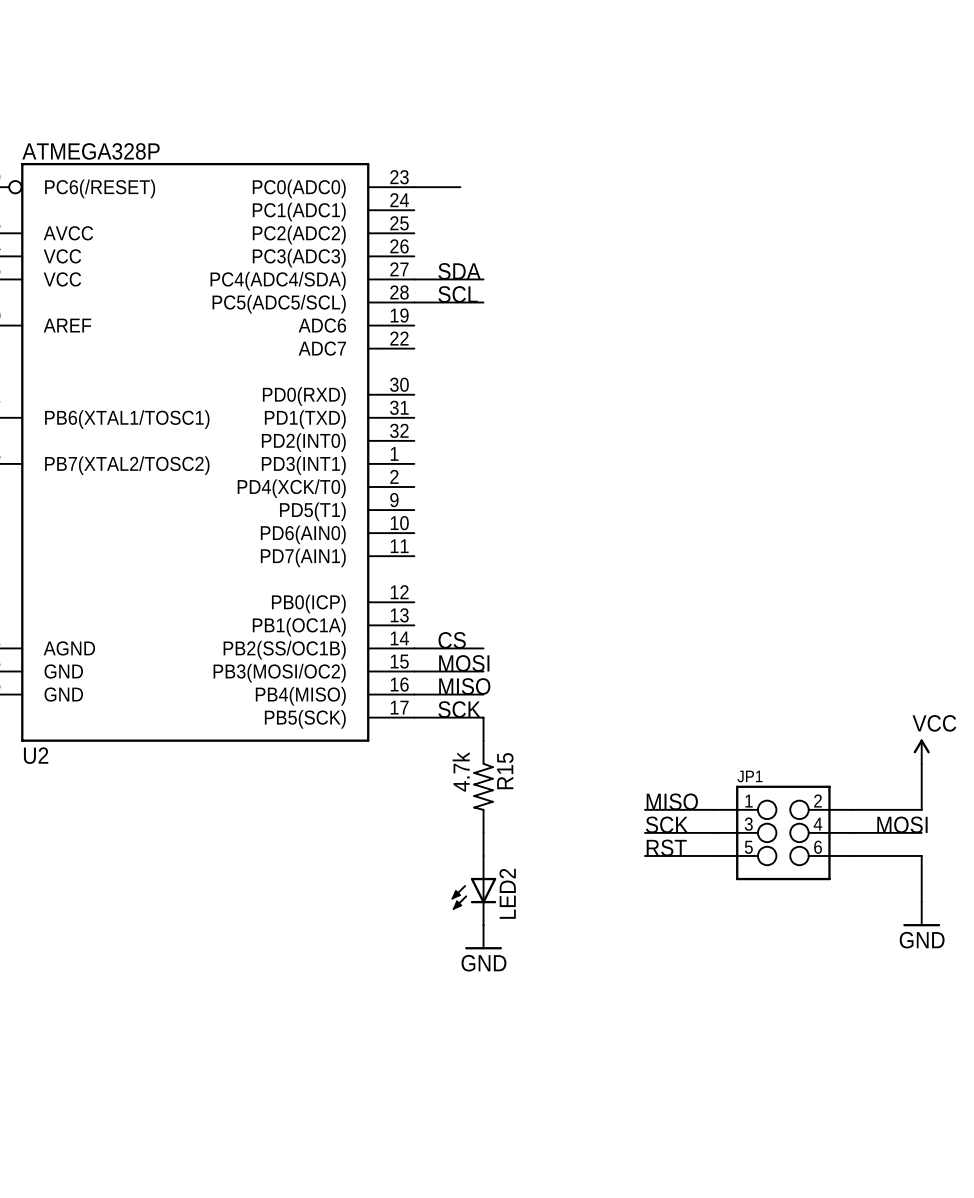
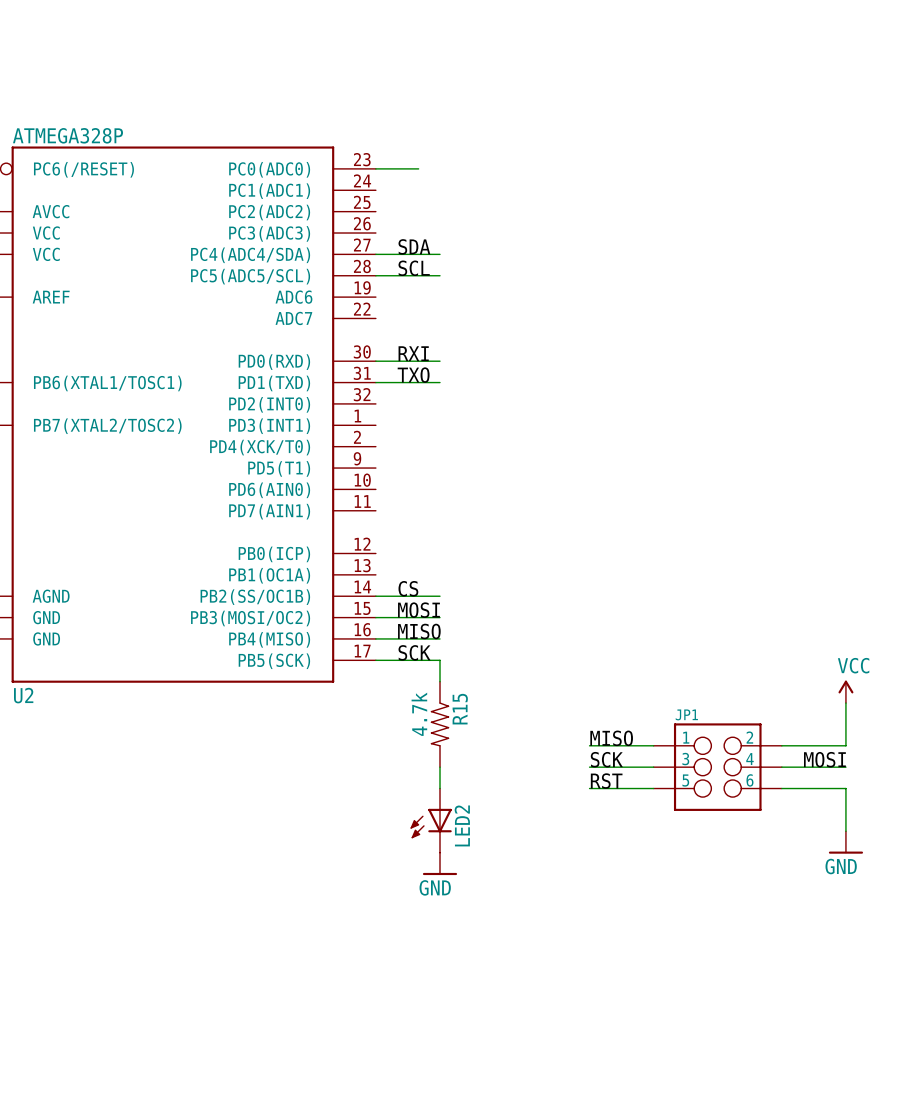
label: none -> RXI (413, 353)
wire: none -> (375, 361) (440, 361)
label: none -> TXO (413, 375)
wire: none -> (375, 382) (440, 382)

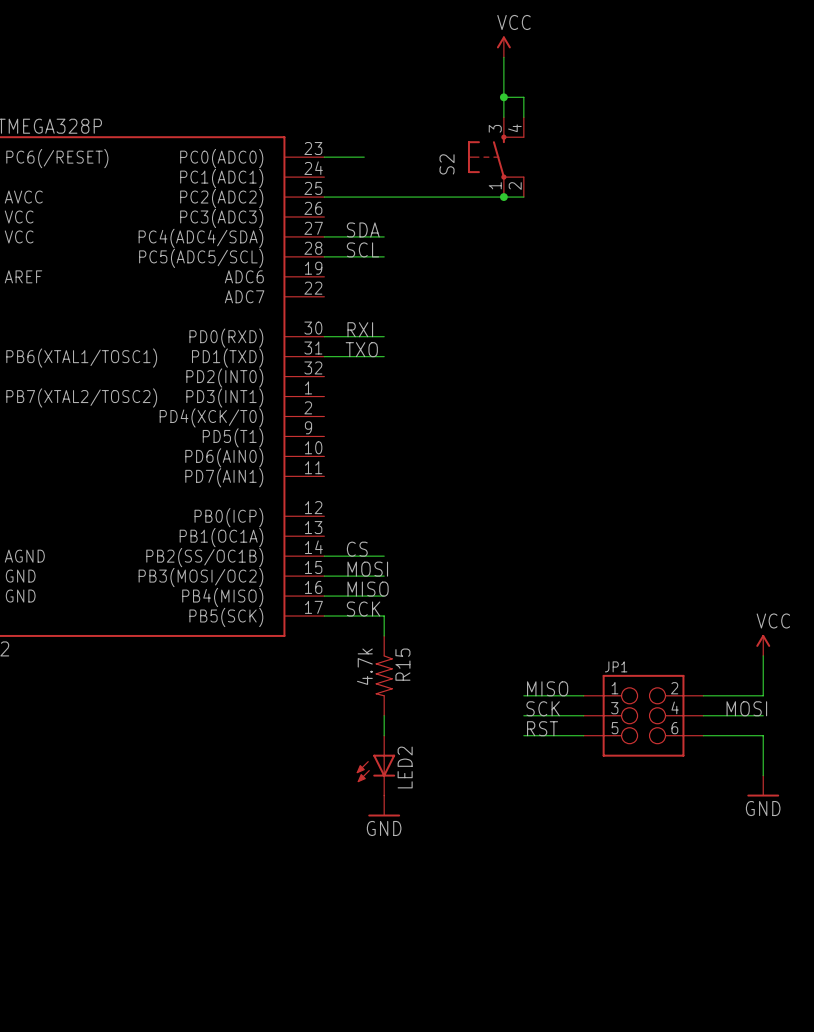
power symbol: none -> VCC (503, 46)
wire: none -> (503, 57) (503, 117)
wire: none -> (503, 97) (523, 97) (523, 117)
junction: none -> (503, 97)
S2: none -> (496, 157)
wire: none -> (324, 197) (523, 197)
junction: none -> (503, 197)

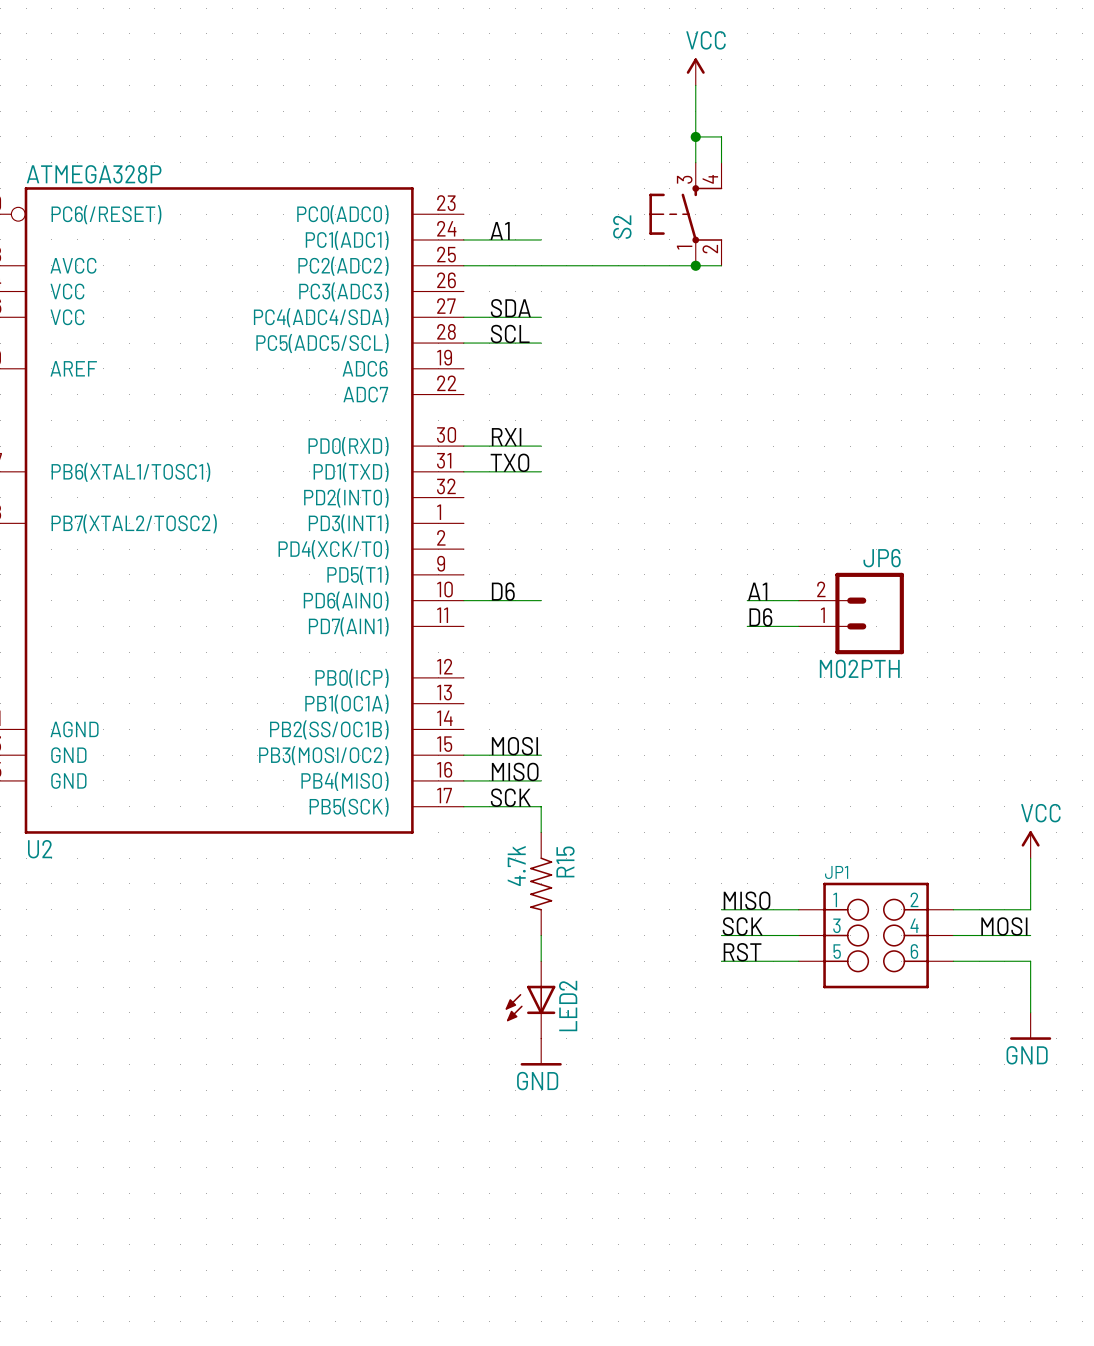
wire: (324, 157) (364, 157) -> none
label: none -> A1 (500, 230)
wire: none -> (463, 239) (541, 239)
label: none -> D6 (503, 591)
label: none -> A1 (757, 591)
wire: none -> (747, 600) (798, 600)
JP6: none -> M02PTH (851, 613)
label: none -> D6 (760, 617)
wire: none -> (747, 626) (798, 626)
label: CS (357, 549) -> none
wire: (324, 556) (384, 556) -> (463, 600) (541, 600)

